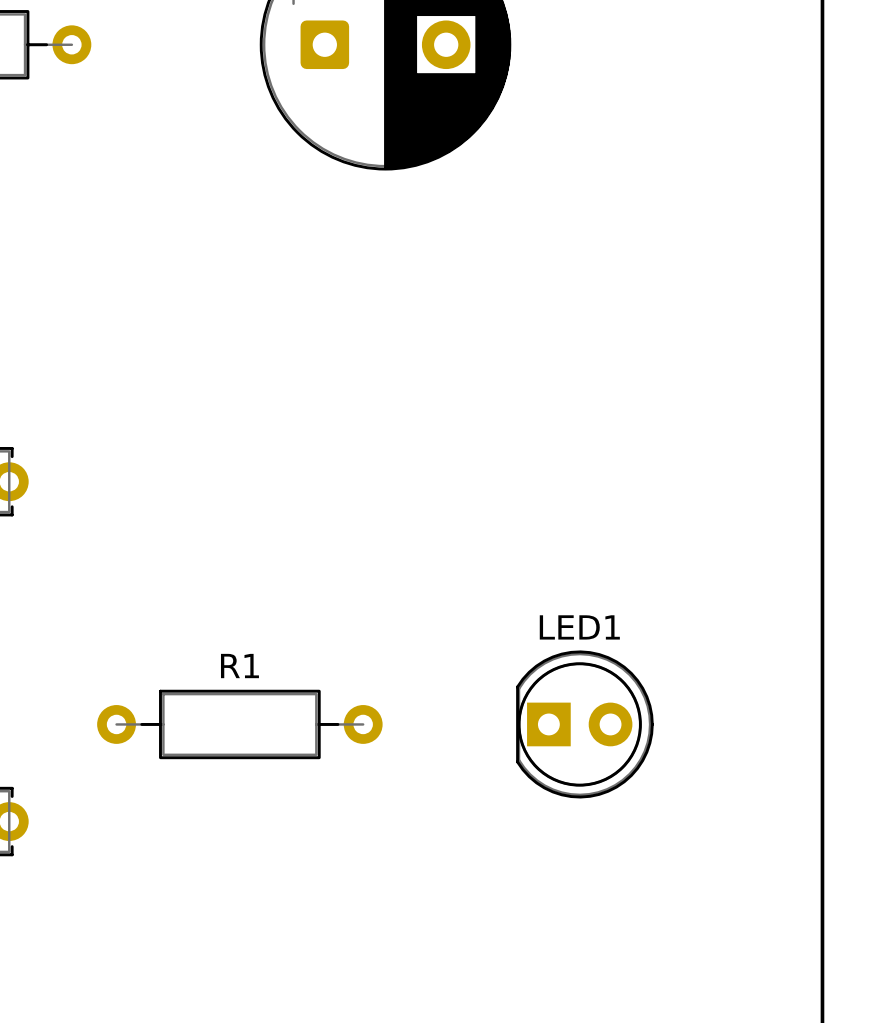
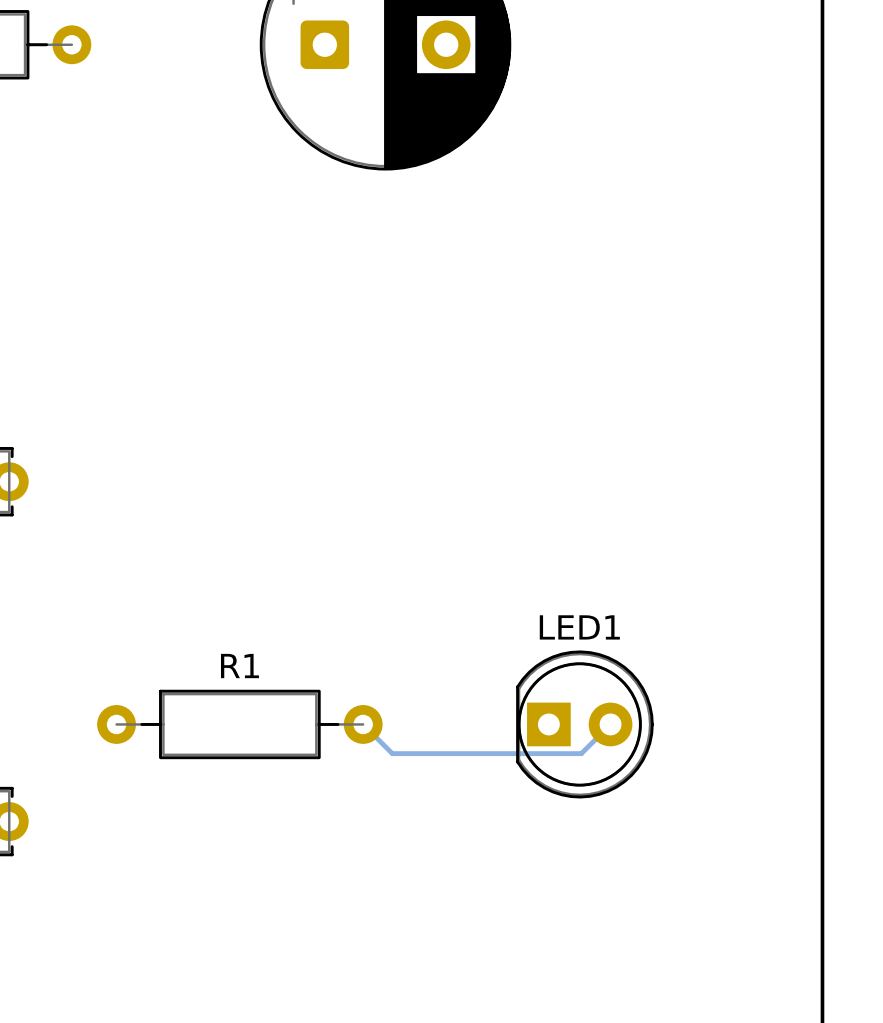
bottom track: none -> (363, 724) (392, 753) (581, 753) (610, 724)

